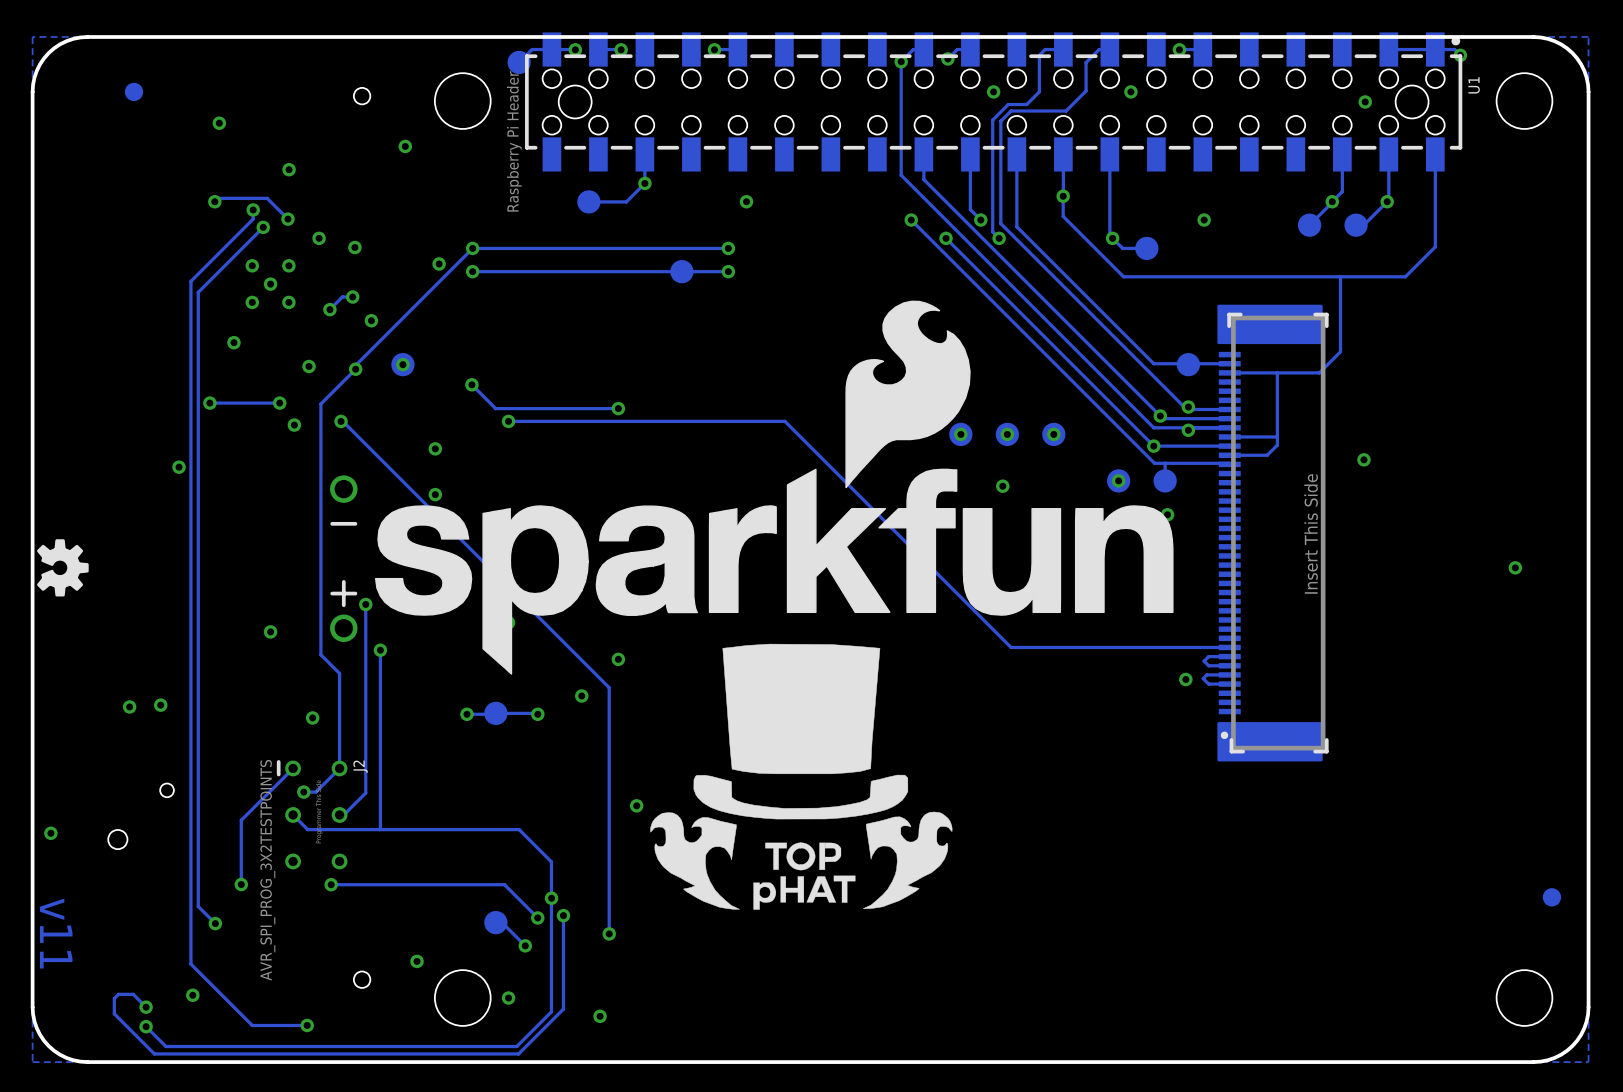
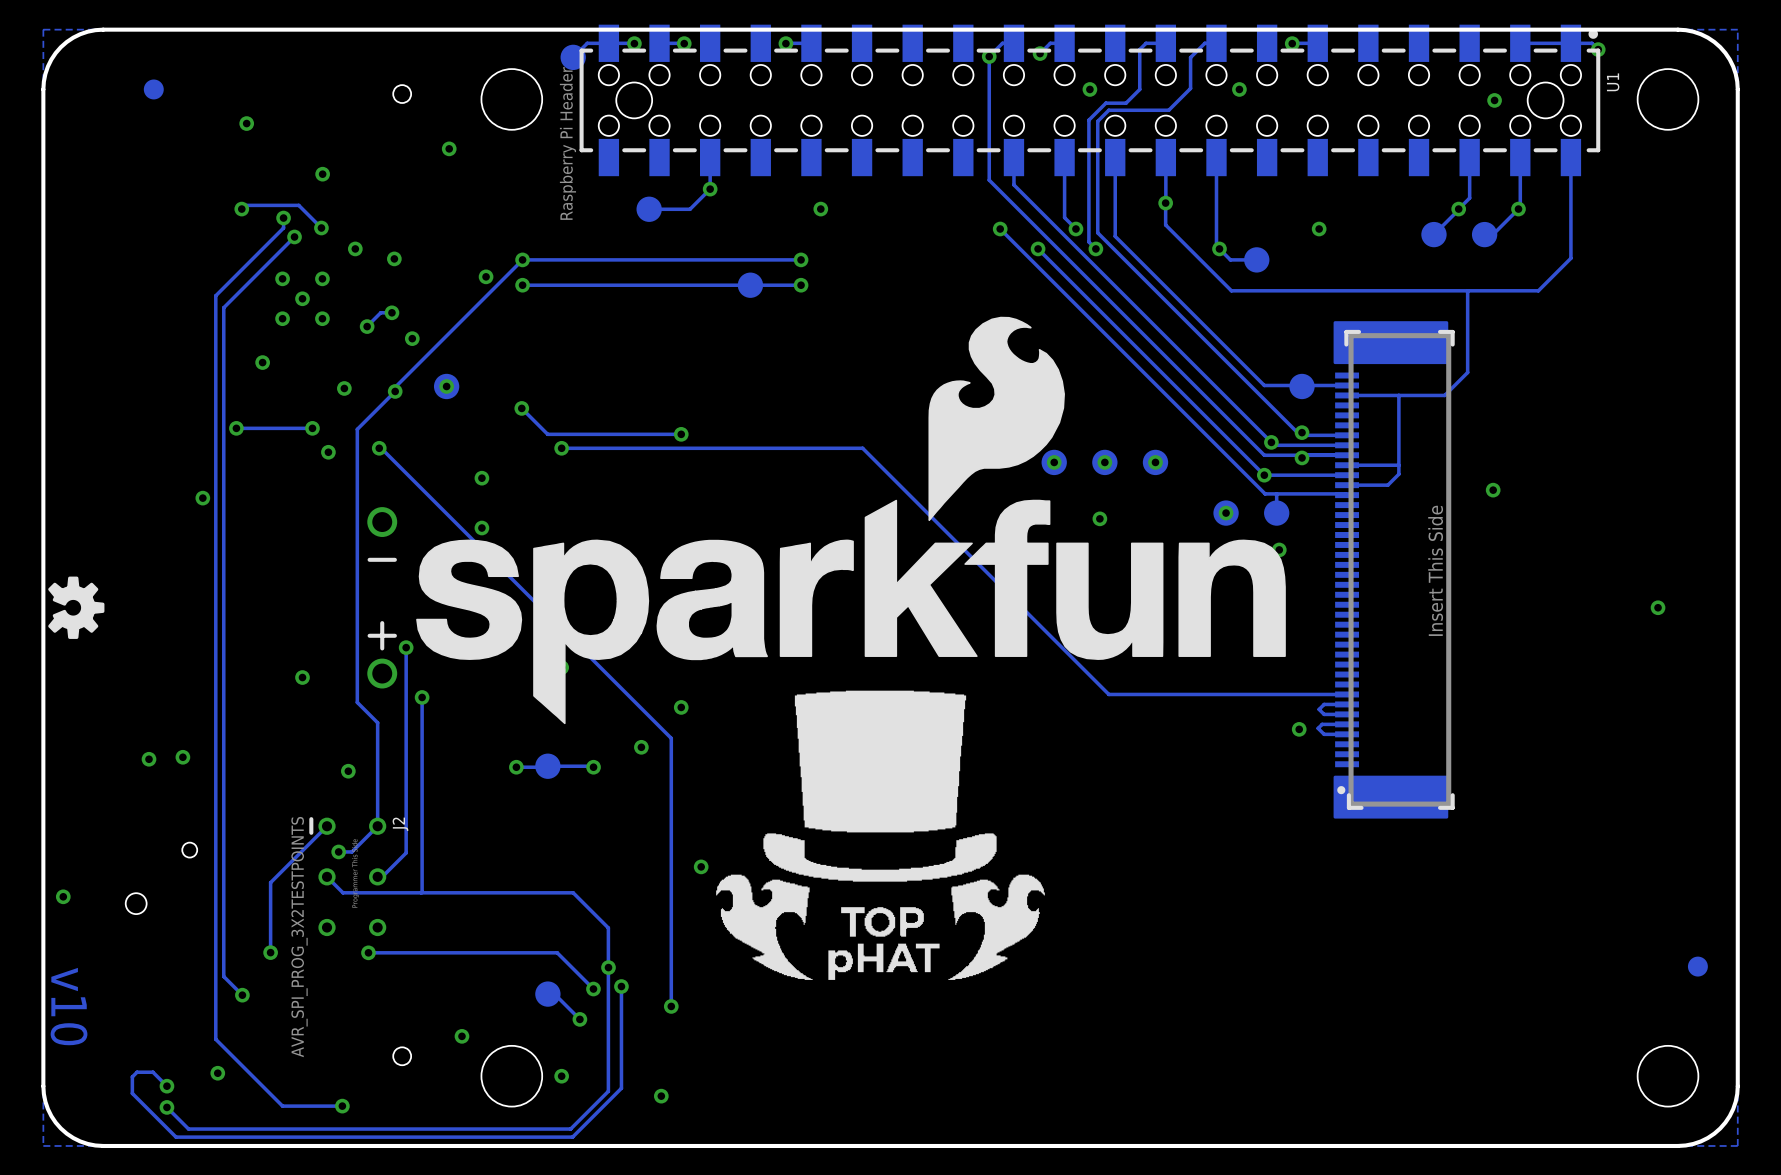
drawing shape: [650, 643, 953, 910] -> [716, 690, 1045, 980]
text: v11 (56, 933) -> v10 (69, 1006)

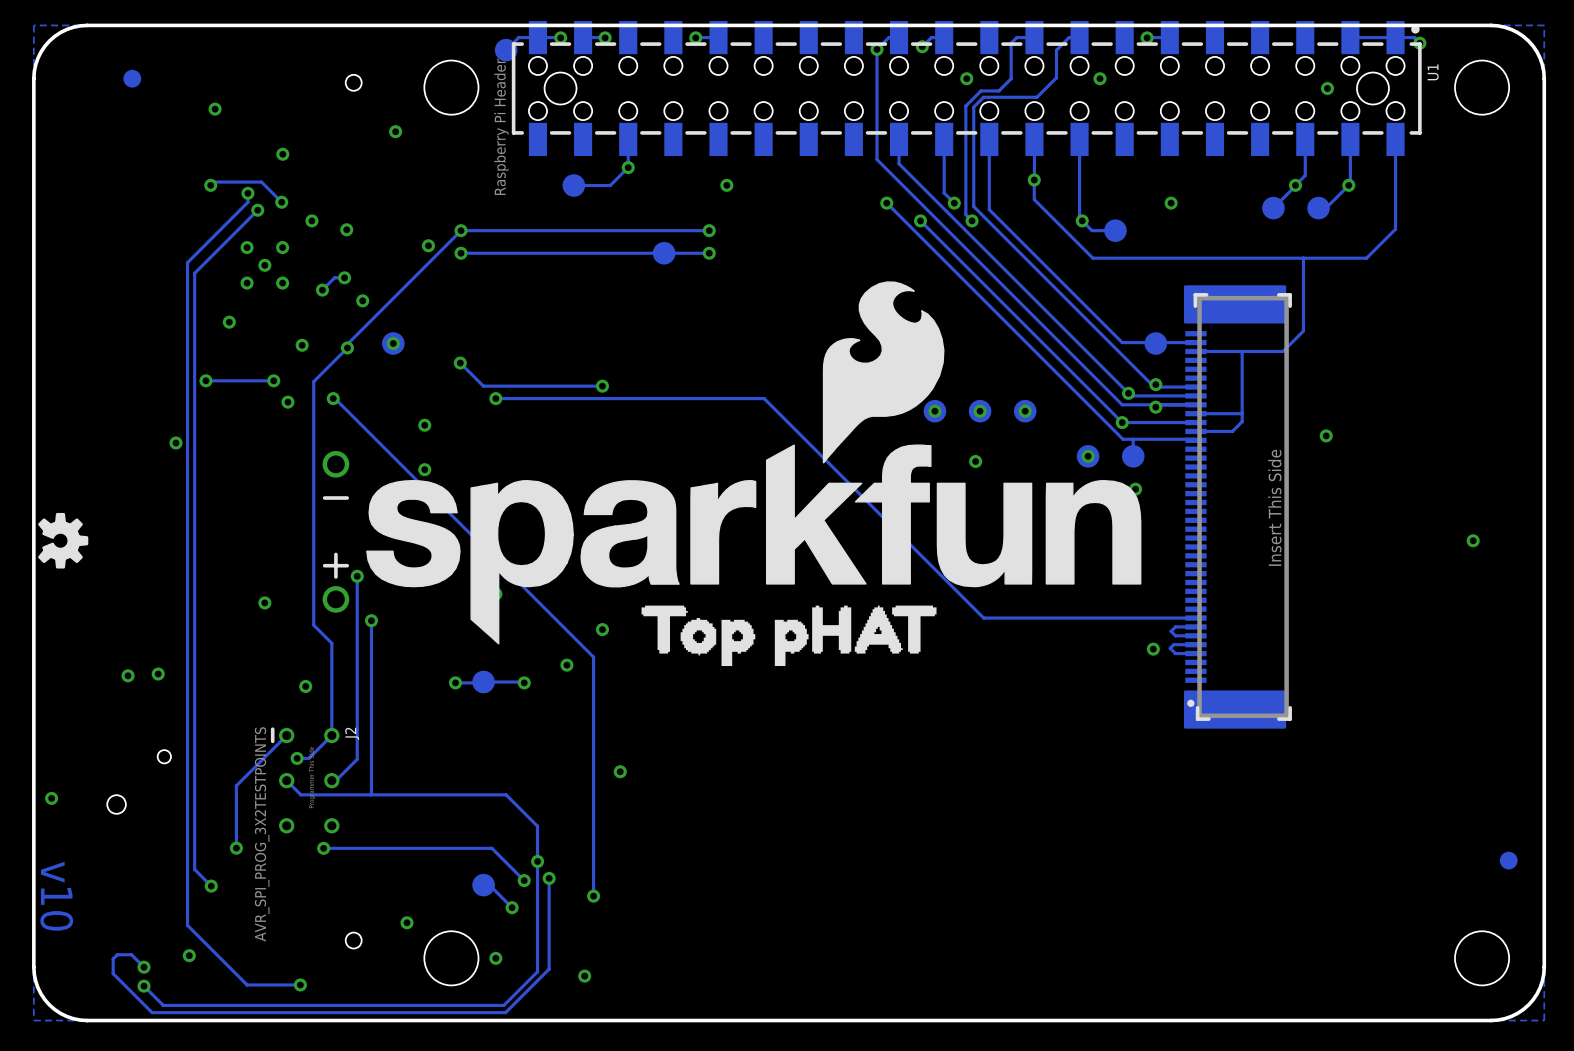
drawing: none -> [641, 605, 937, 667]
drawing: [716, 690, 1045, 980] -> none

